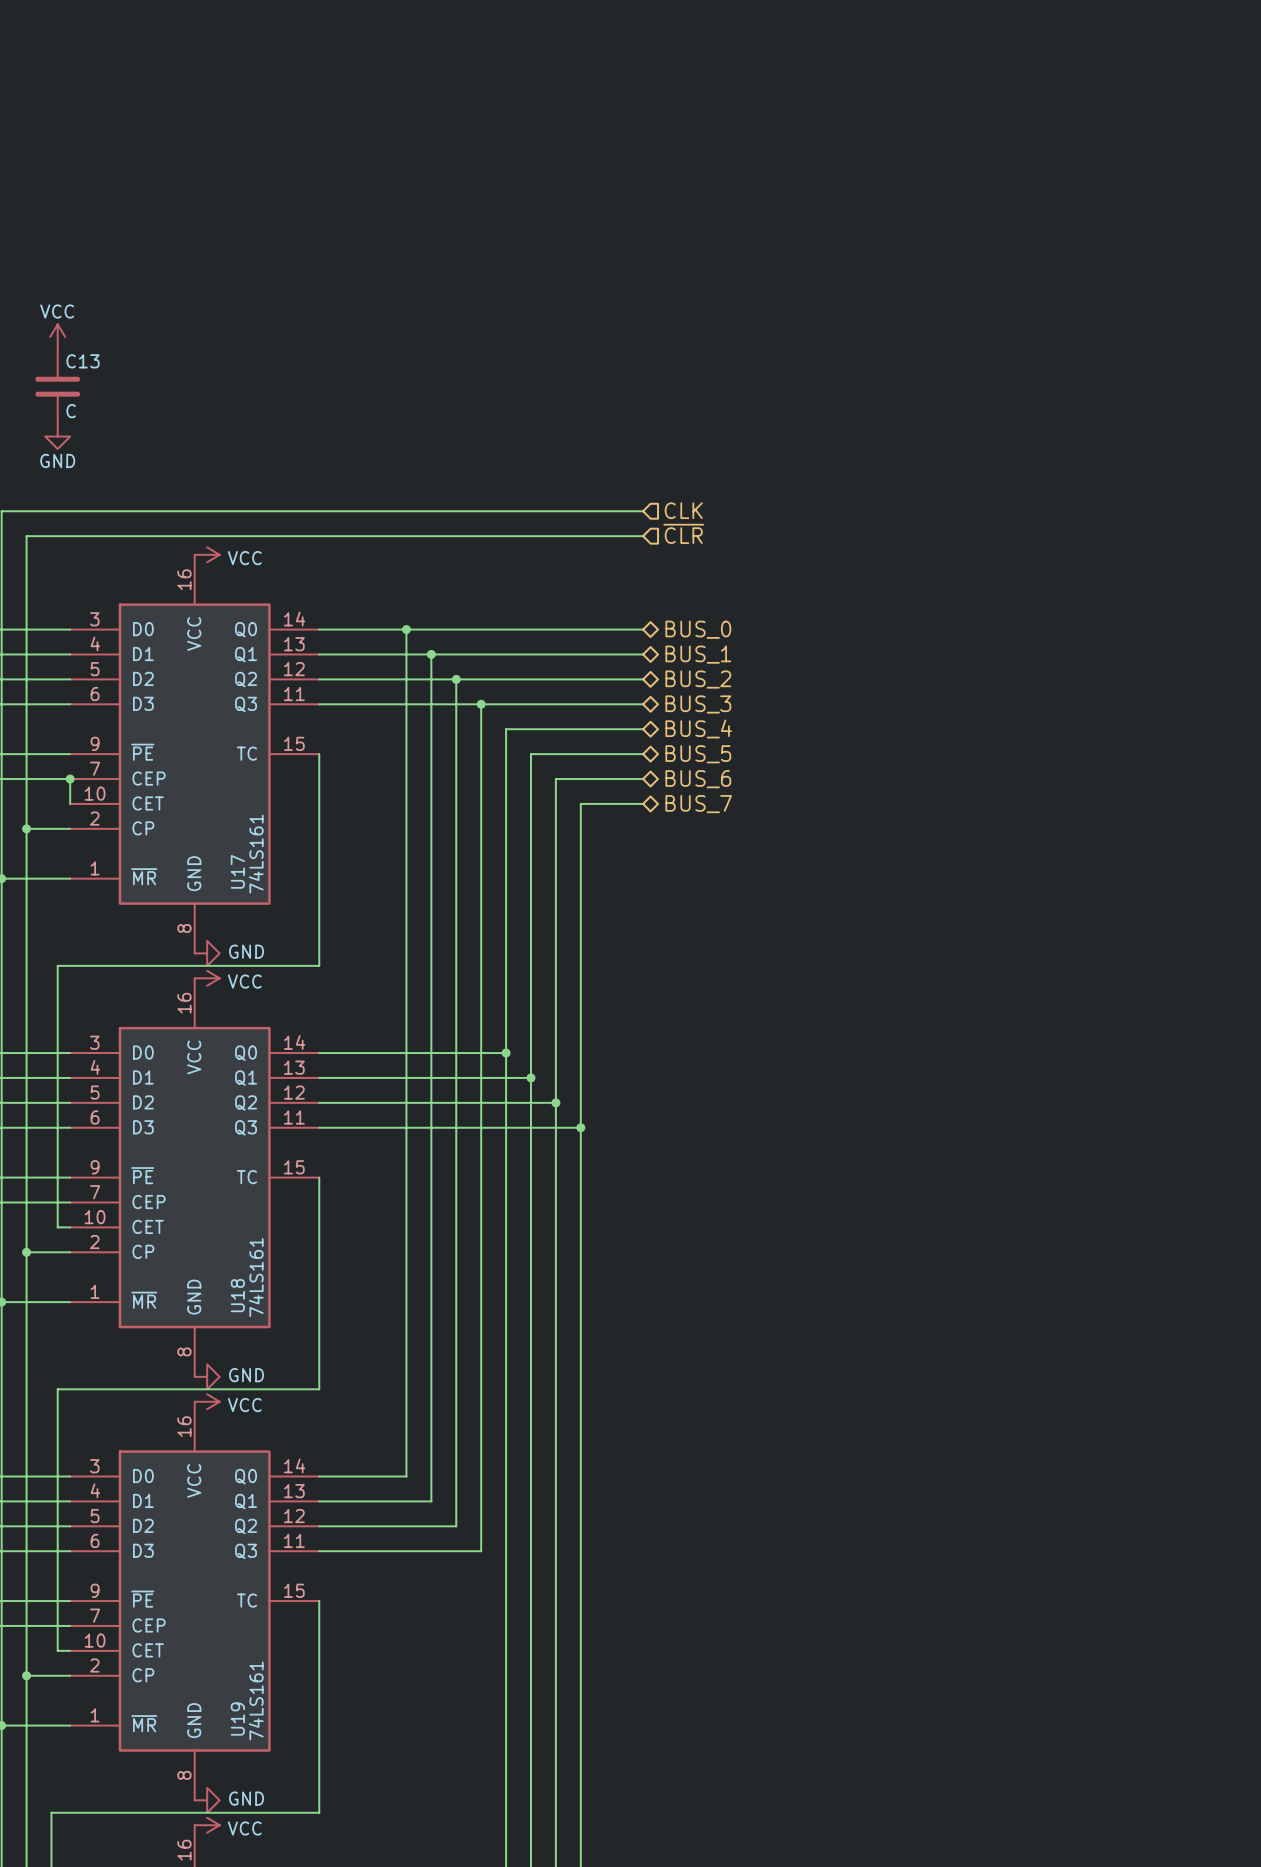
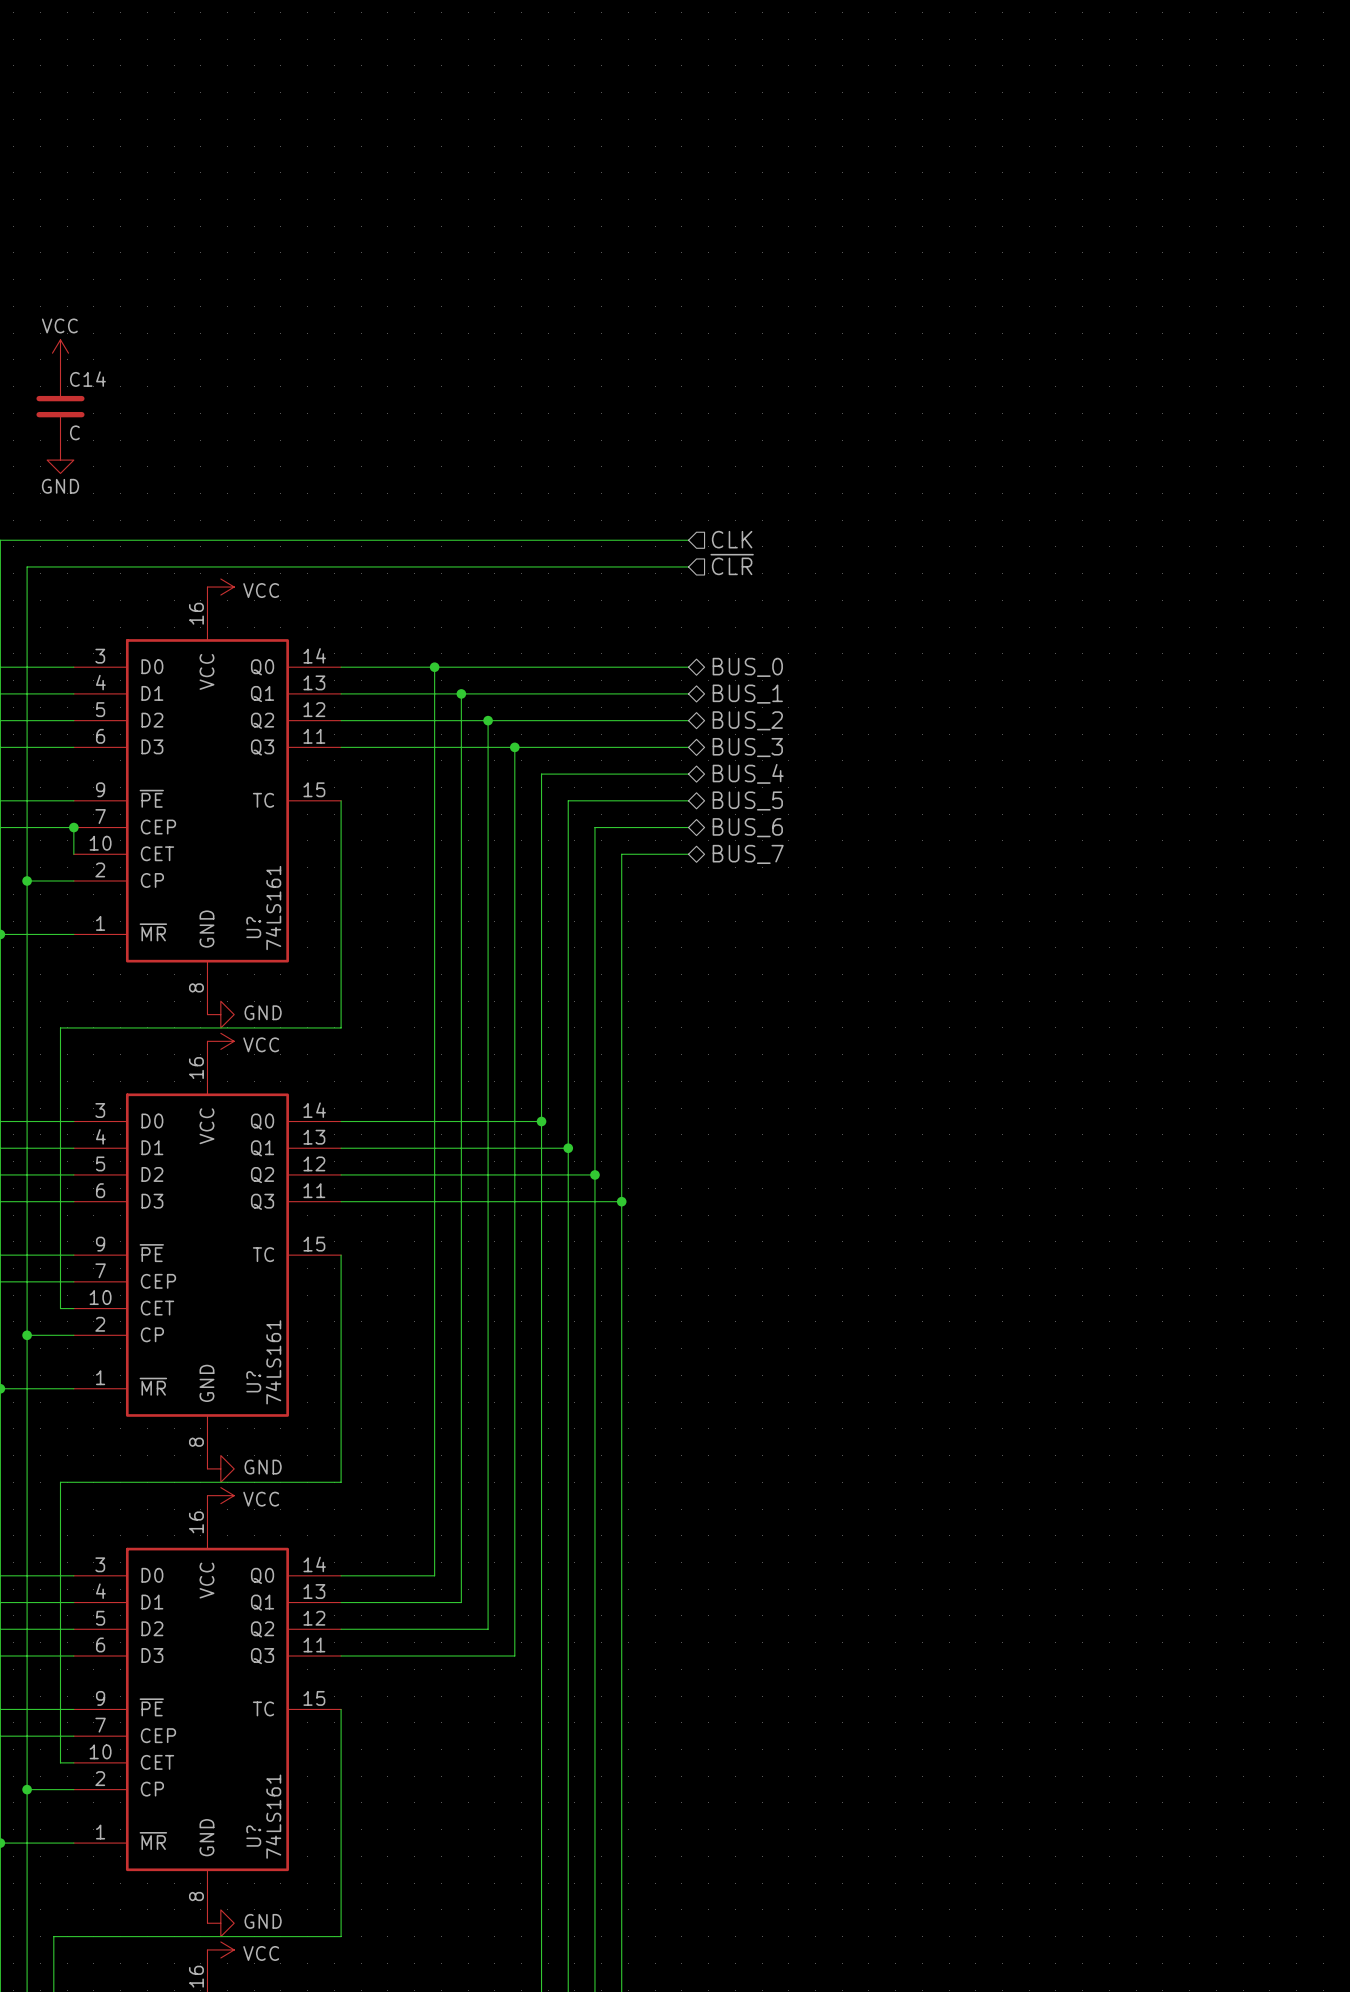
C13 name: C13 (83, 361) -> C14 (87, 379)
U17 name: U17 (237, 871) -> U? (253, 927)
U18 name: U18 (237, 1295) -> U? (253, 1381)
U19 name: U19 (237, 1719) -> U? (253, 1836)

